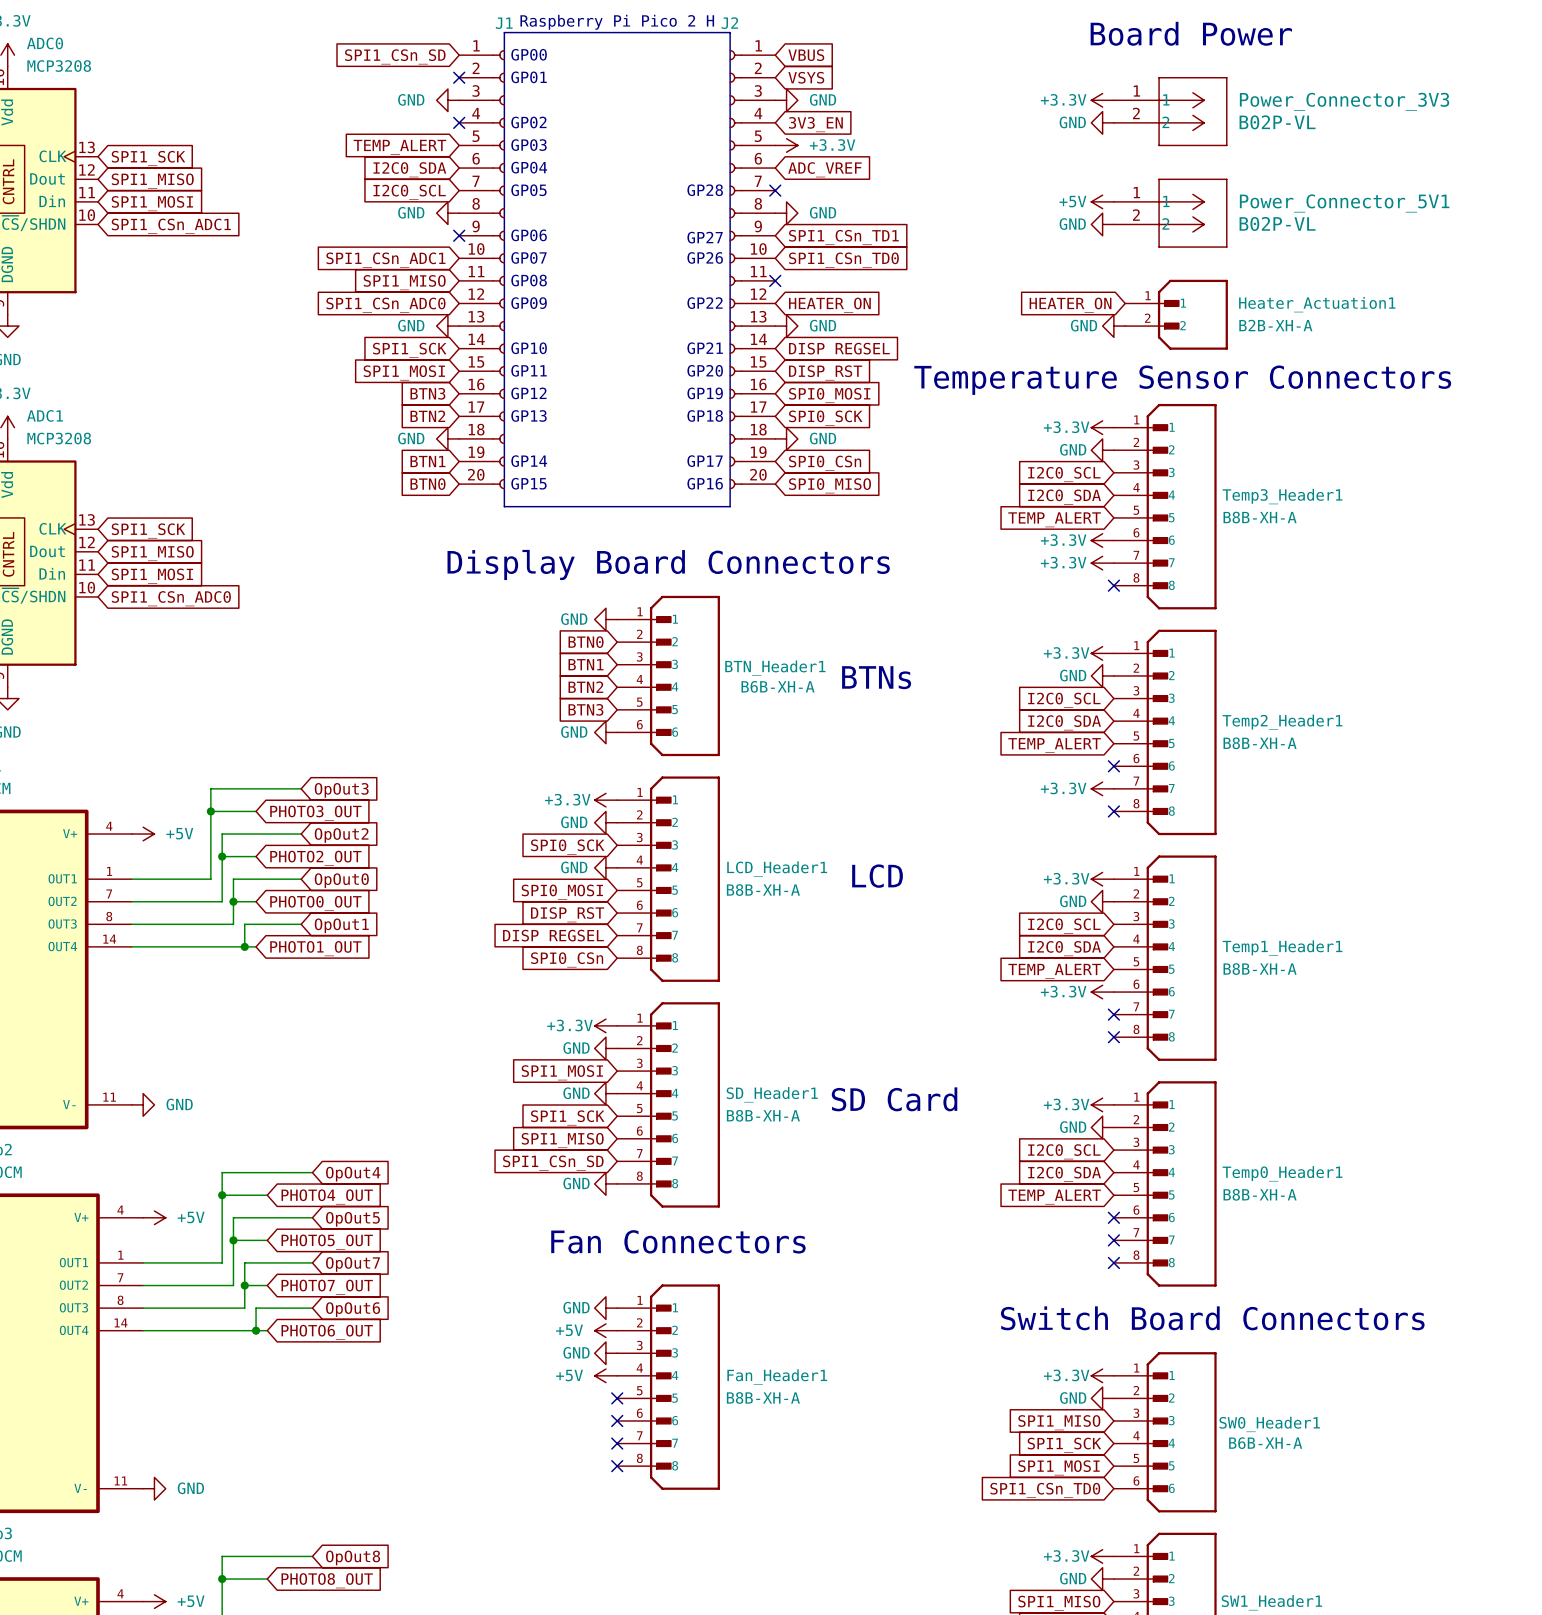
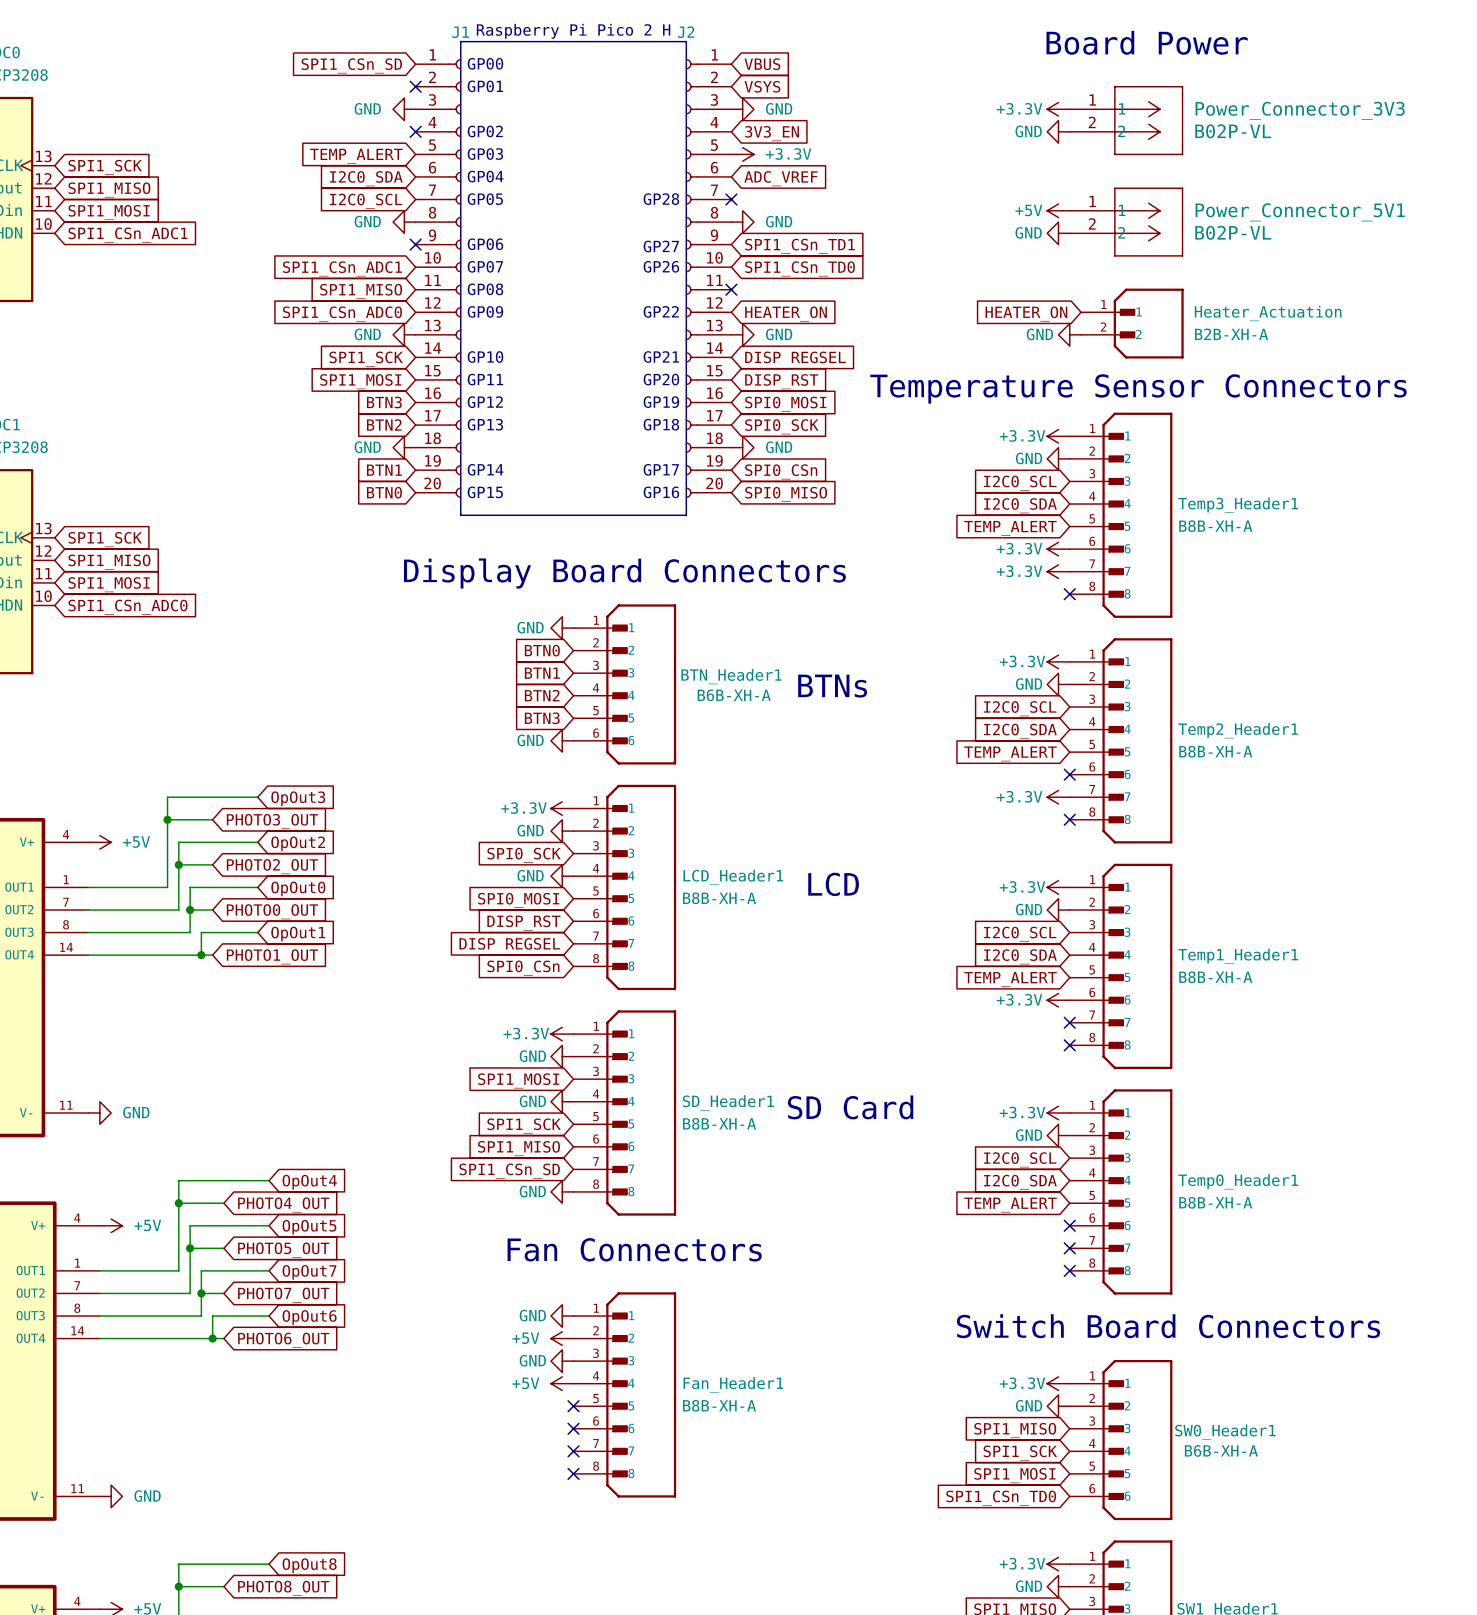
Heater_Actuation1 name: Heater_Actuation1 (1317, 304) -> Heater_Actuation (1268, 313)

